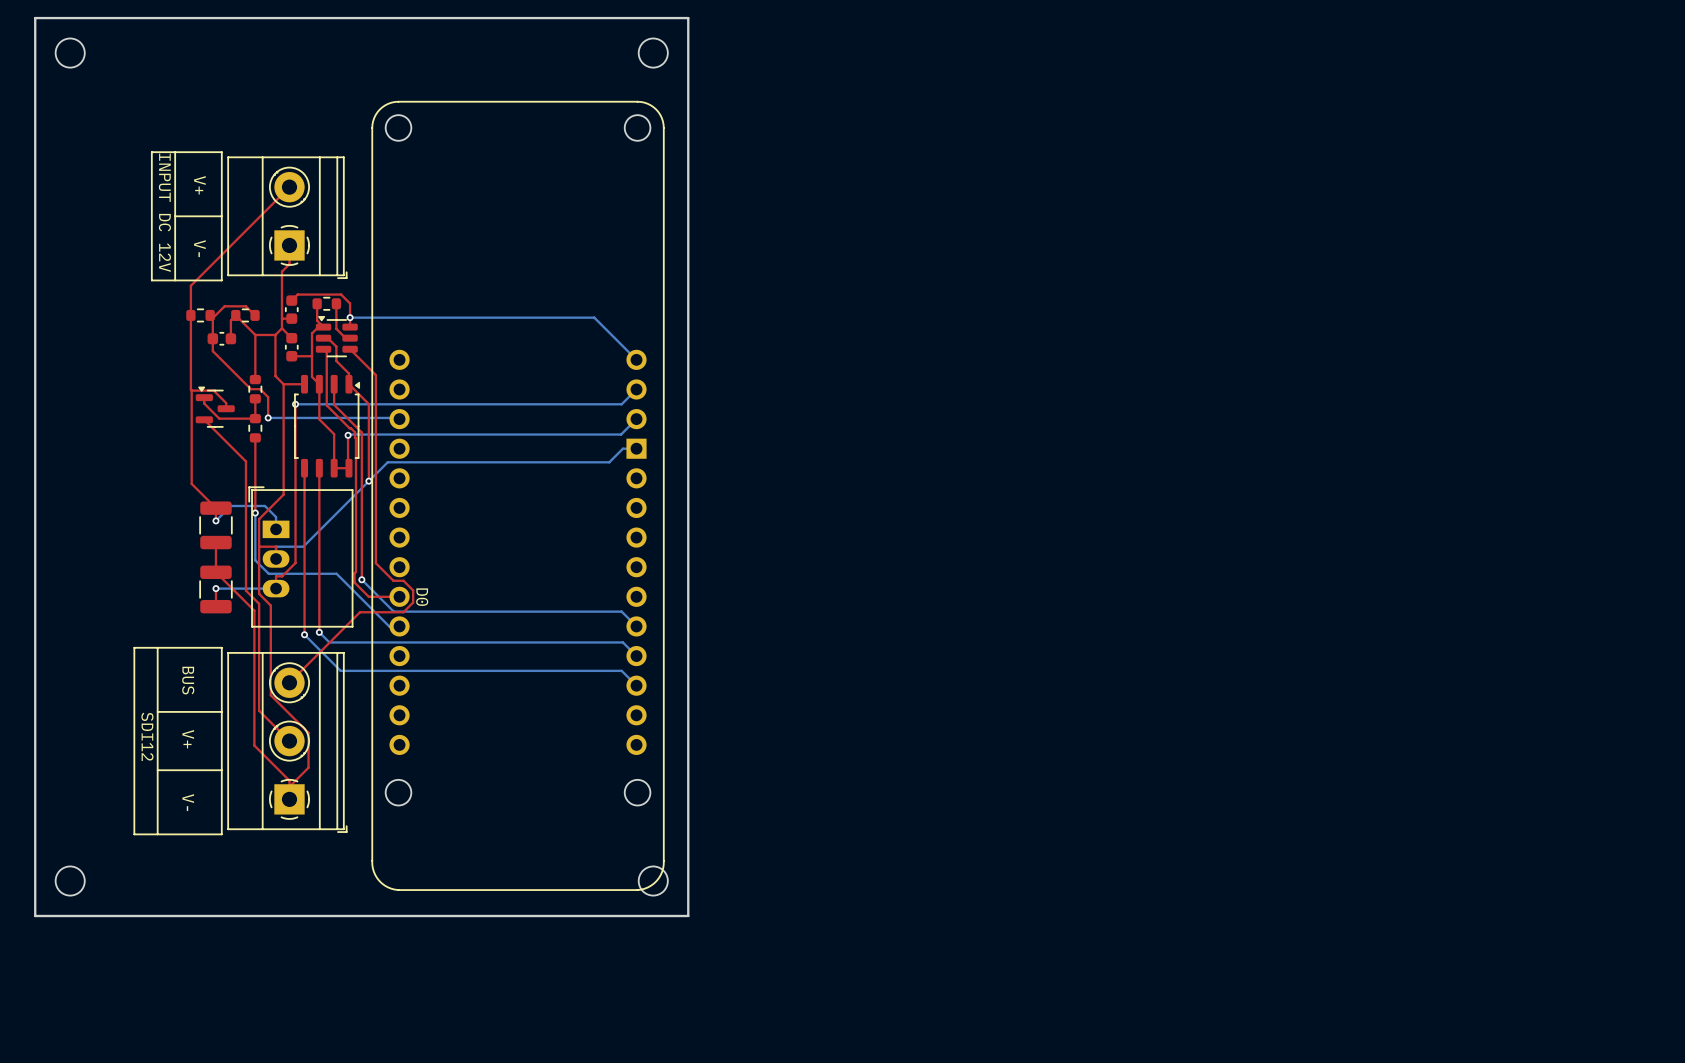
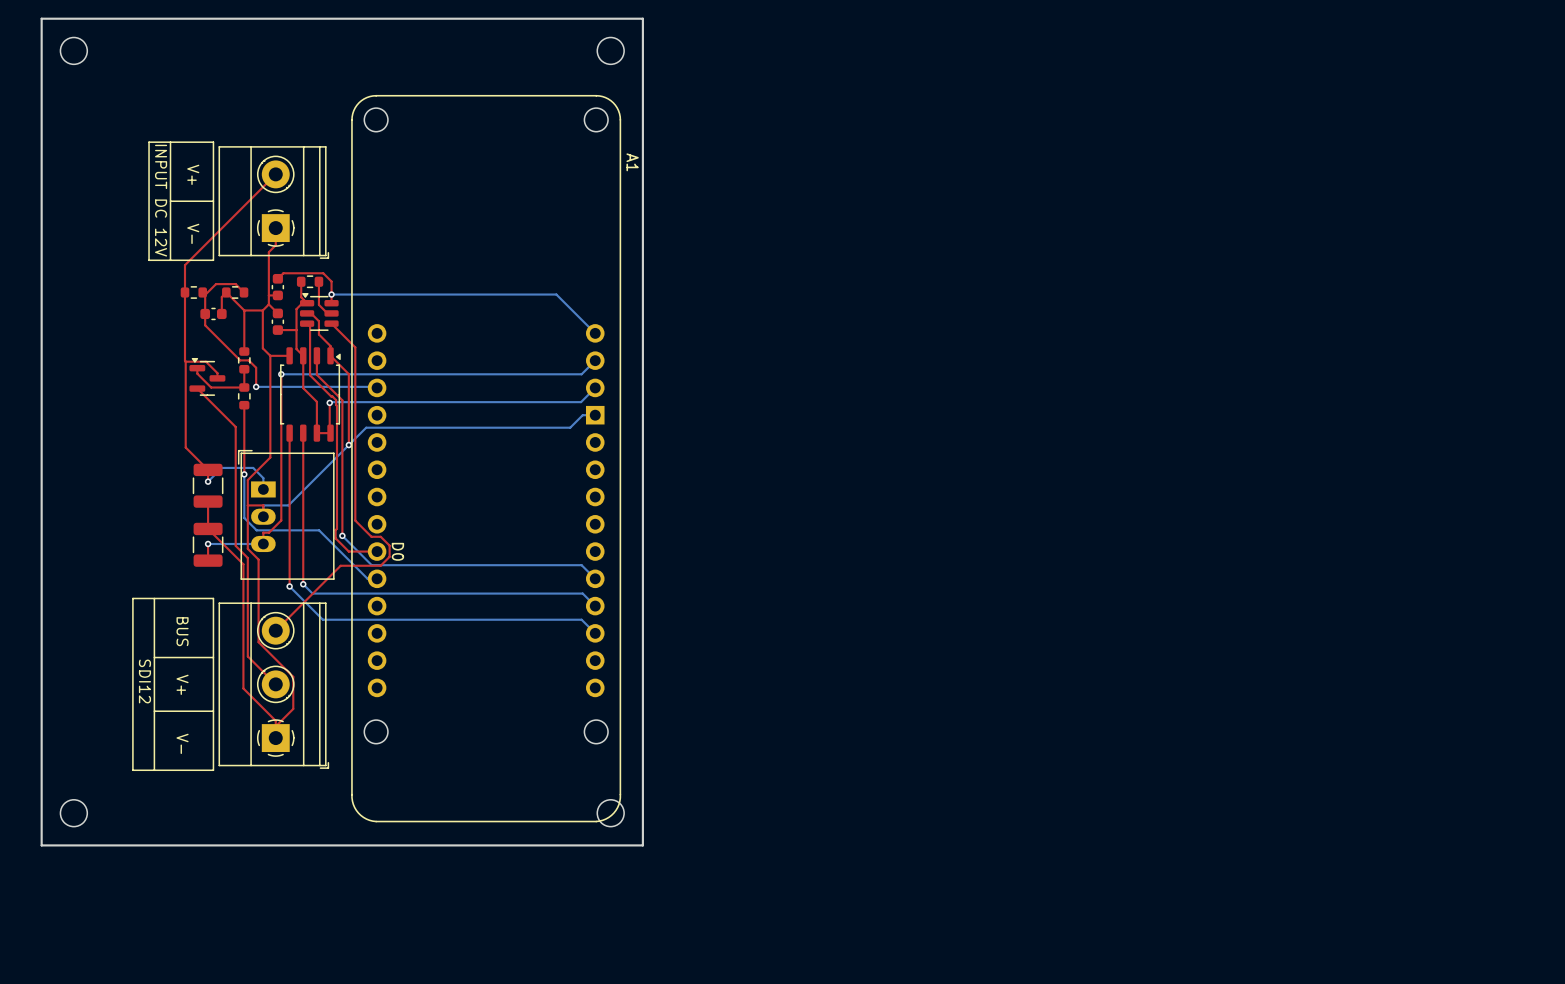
A1 name: none -> A1 (632, 162)

